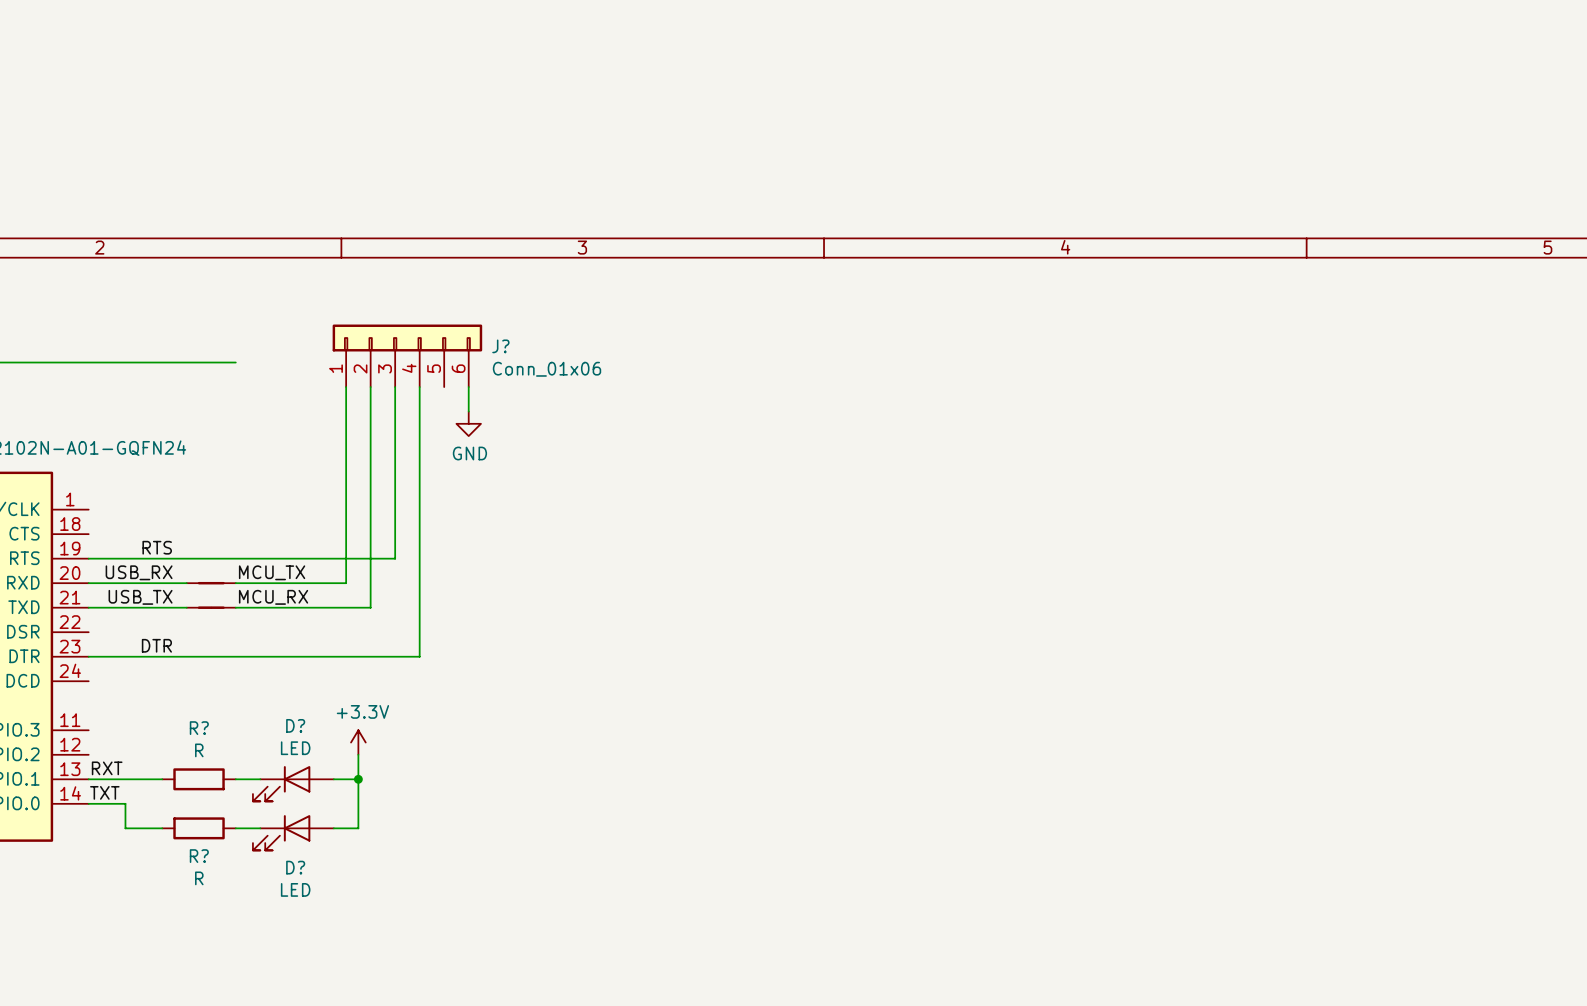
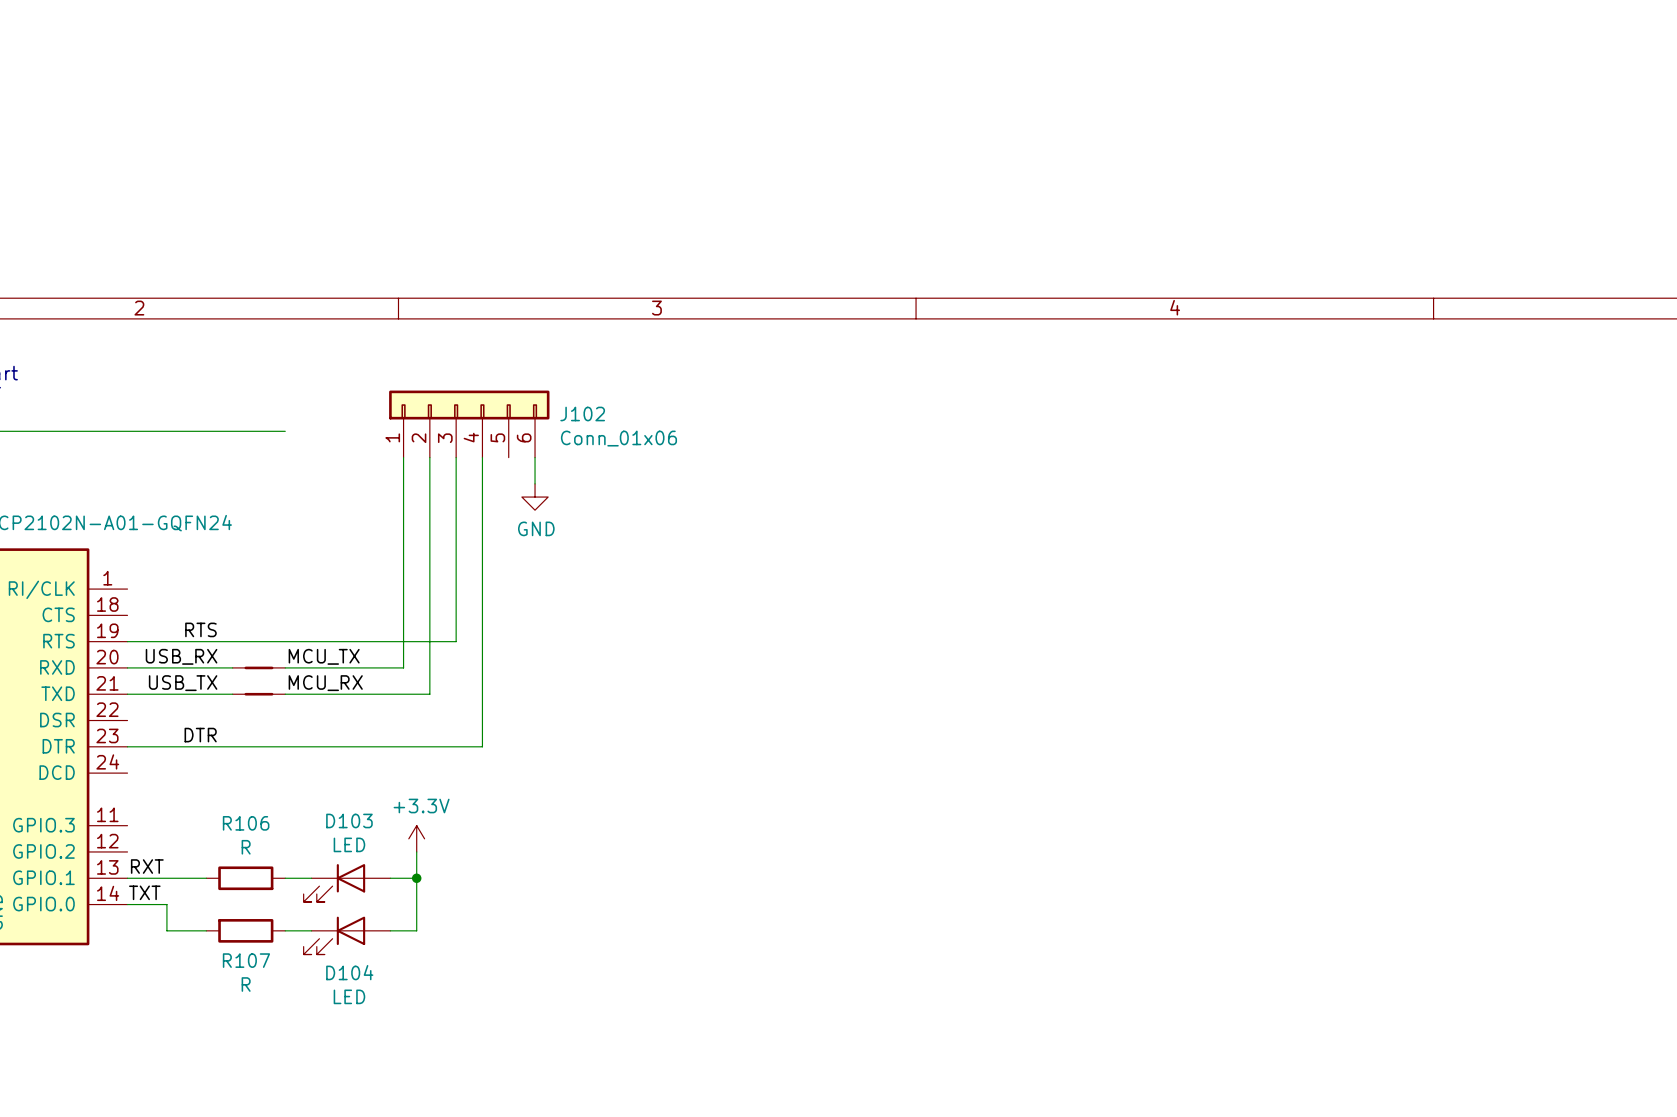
J? name: J? (500, 346) -> J102 (582, 414)
D? name: D? (295, 725) -> D103 (349, 820)
R? name: R? (199, 728) -> R106 (246, 823)
R? name: R? (199, 856) -> R107 (246, 960)
D? name: D? (295, 867) -> D104 (349, 972)

